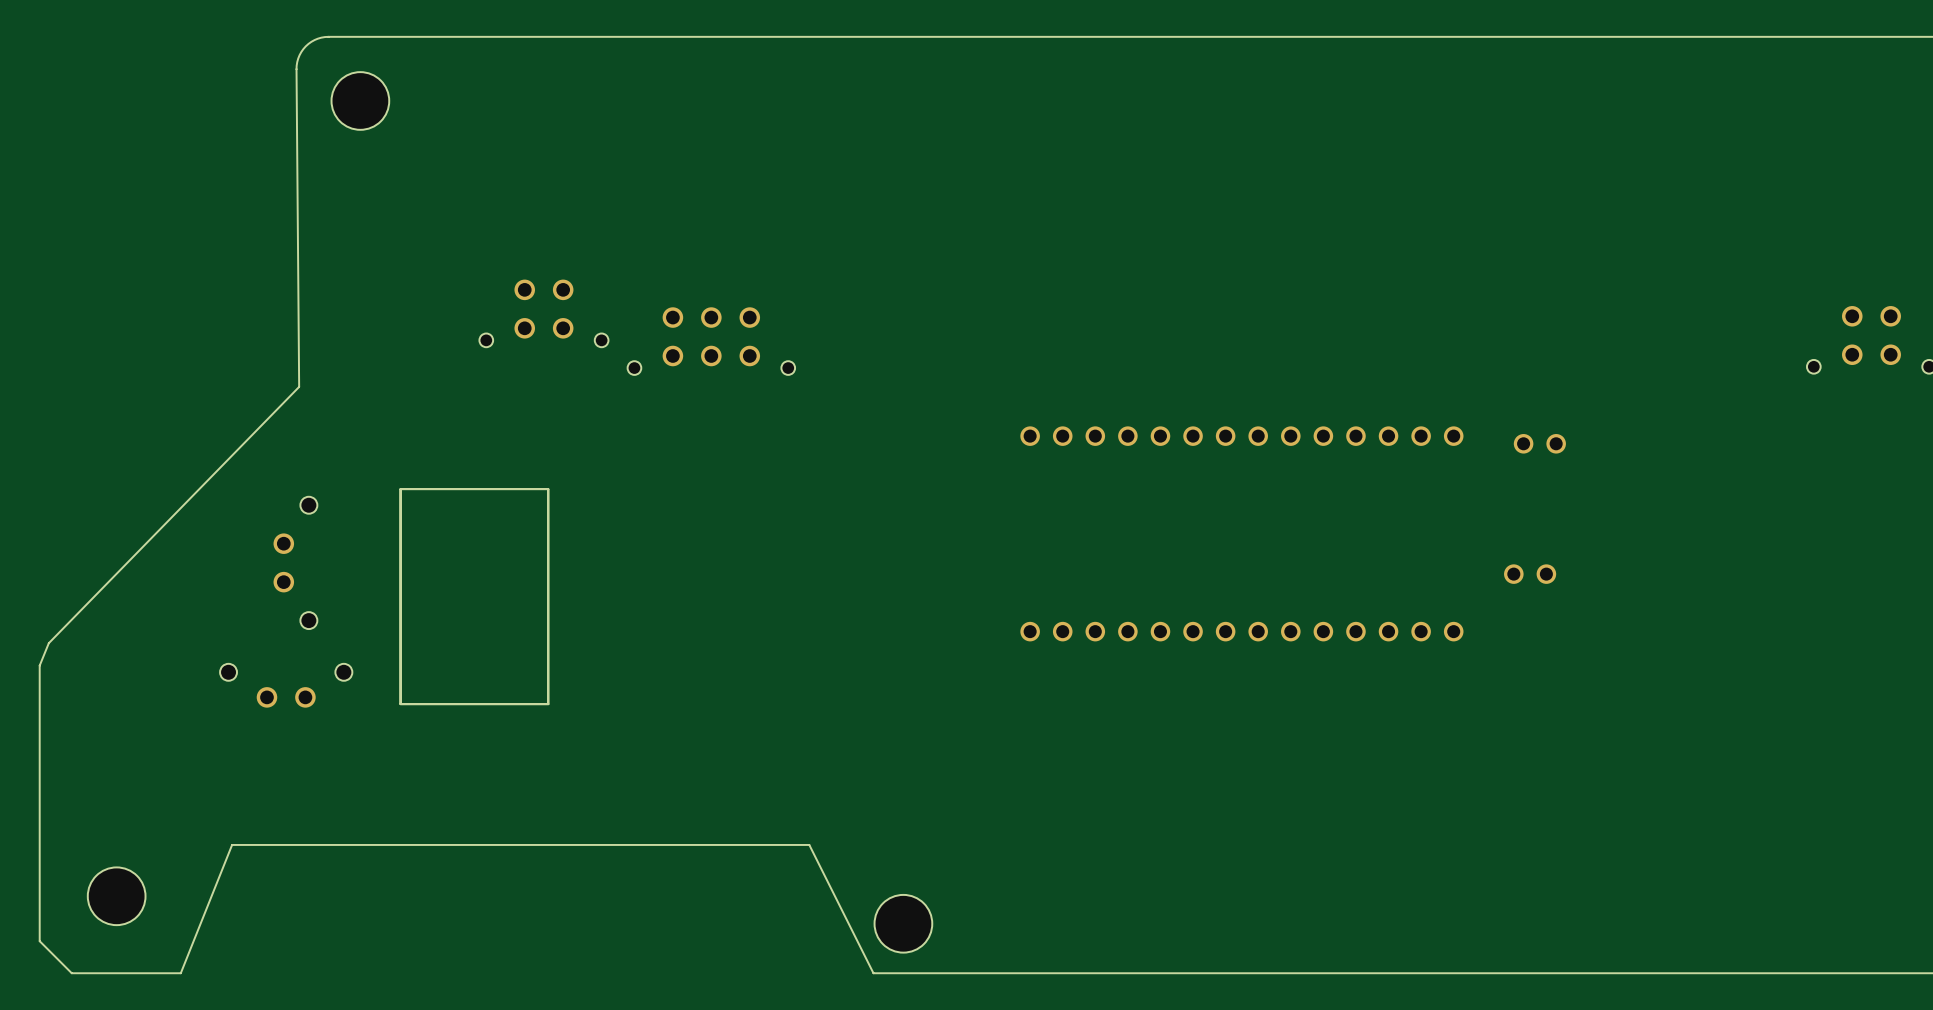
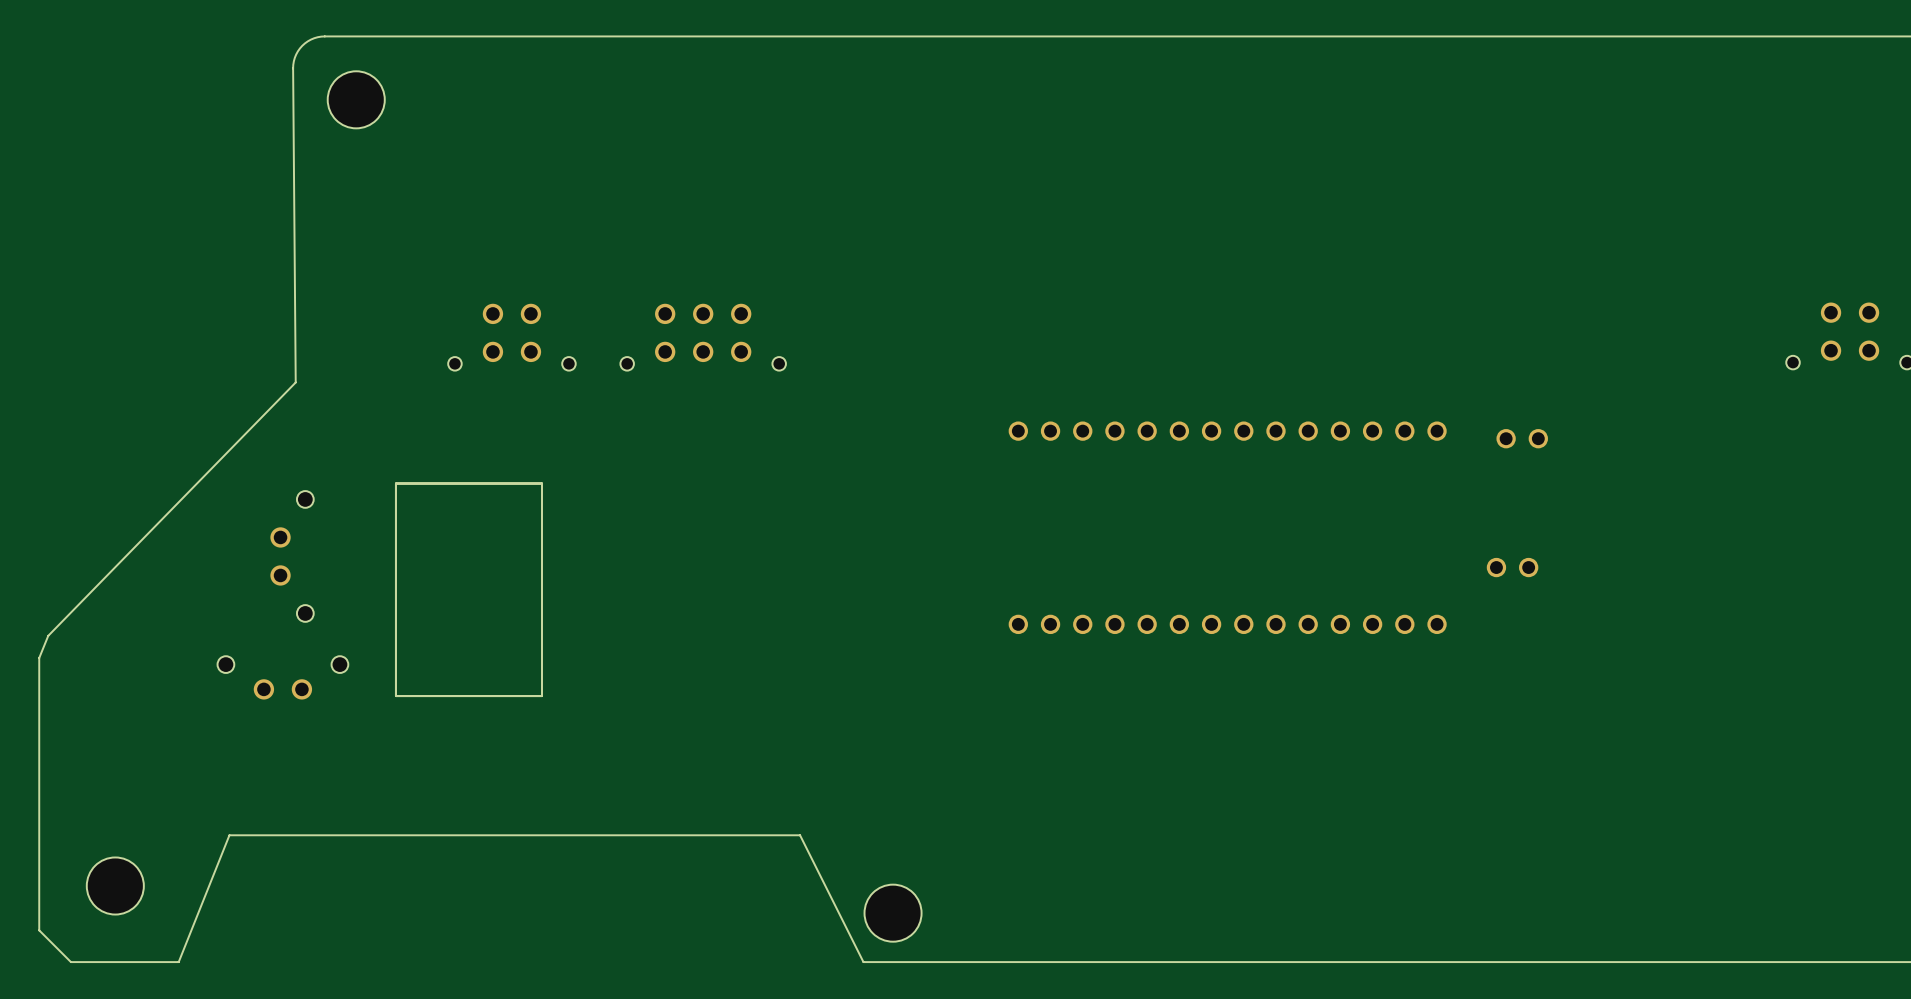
part position: (543, 313) -> (511, 337)

